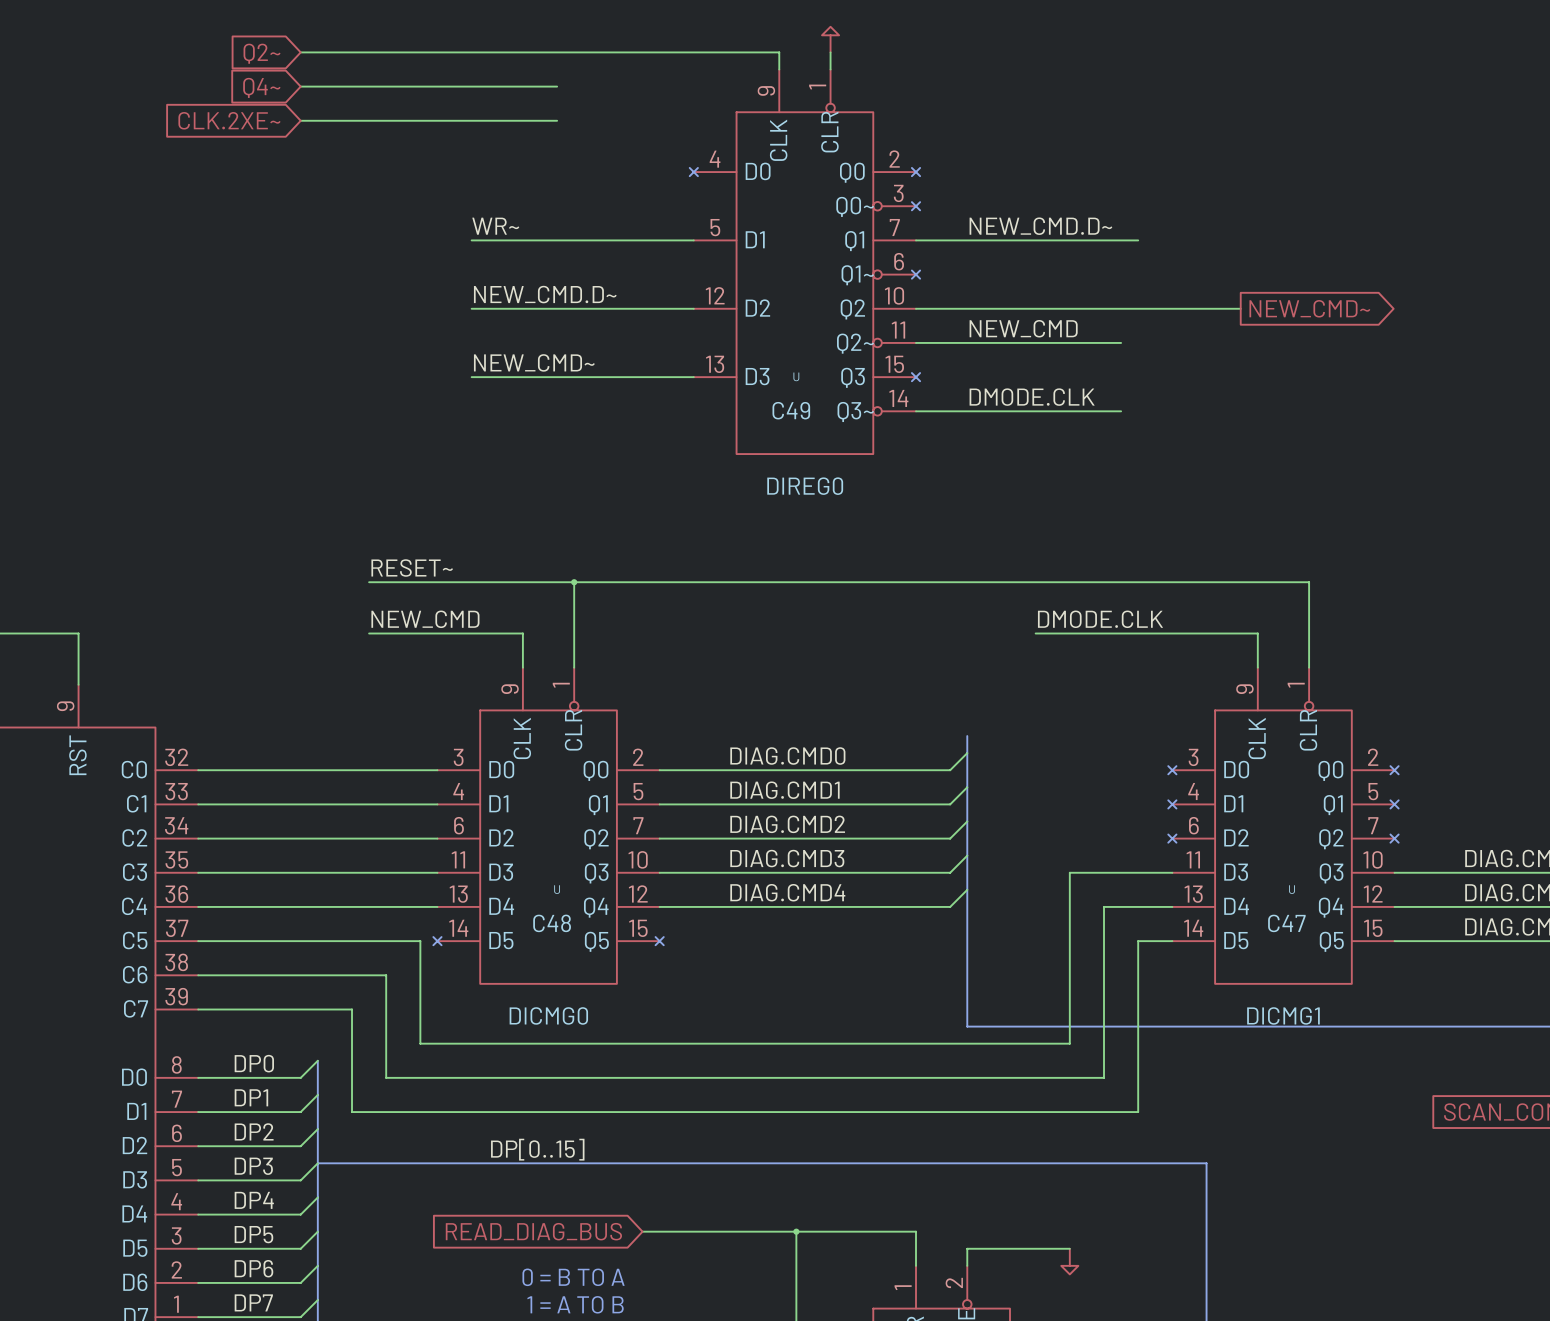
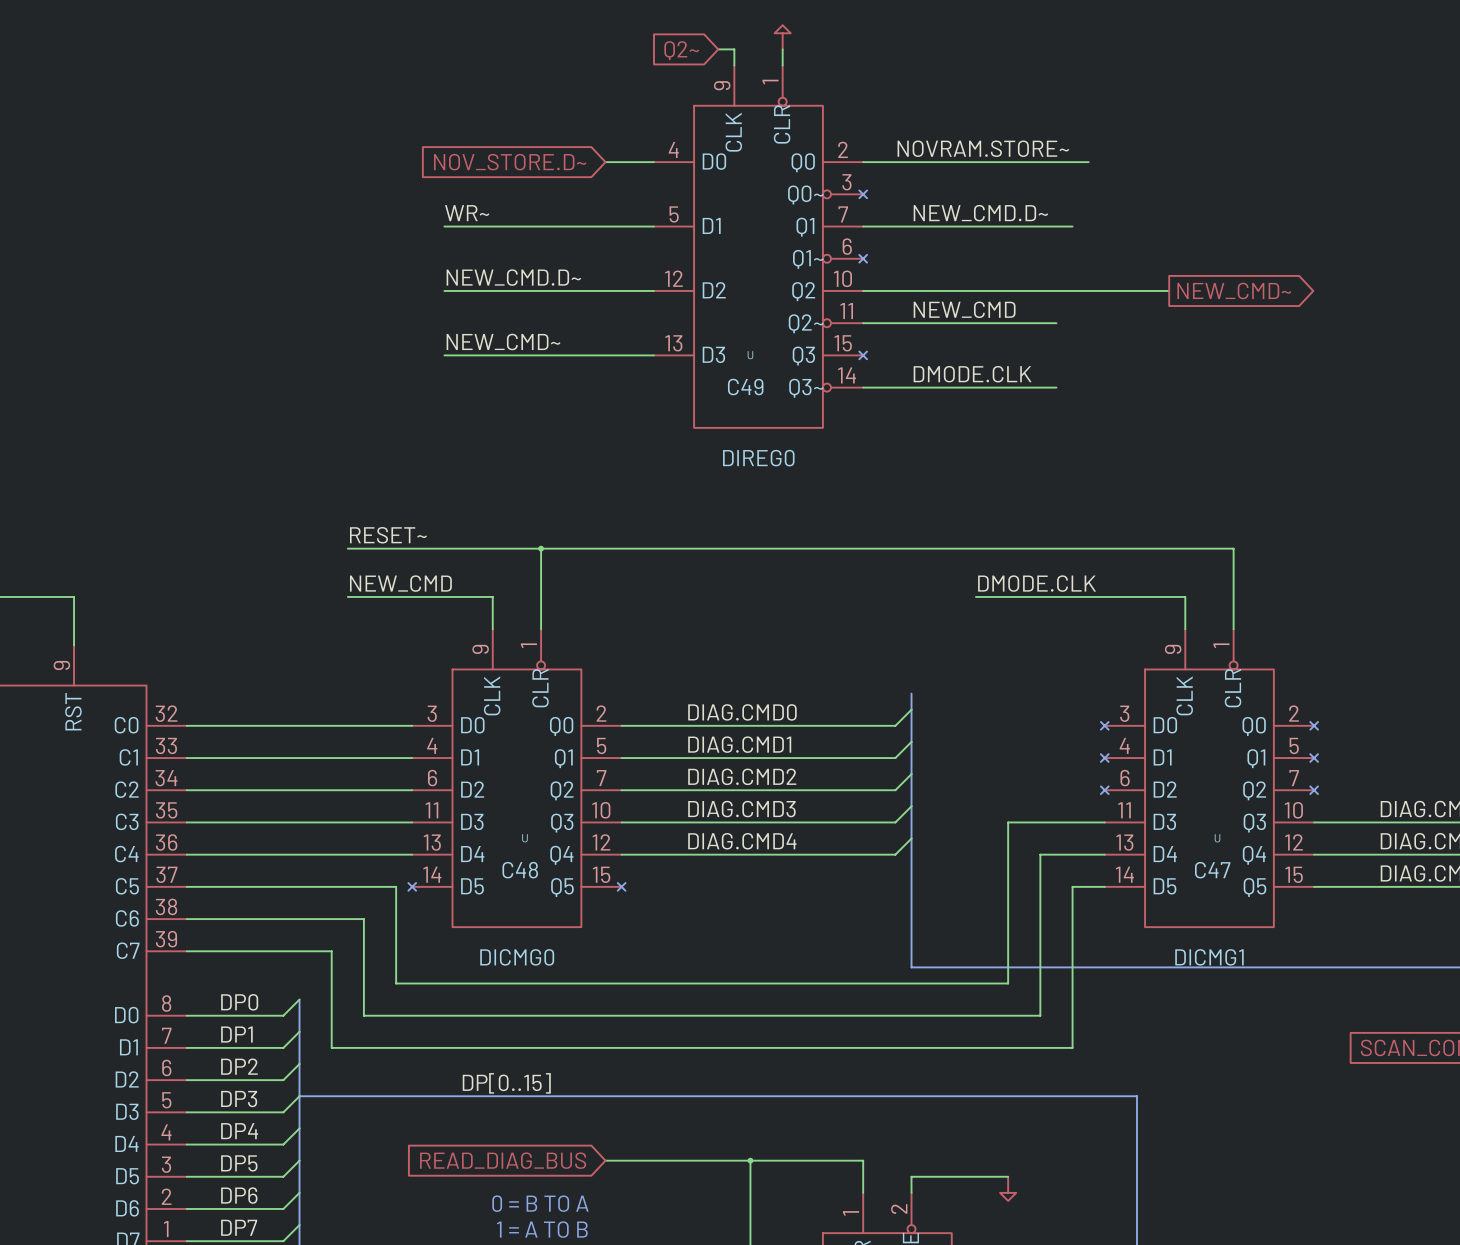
wire: (300, 52) (762, 52) -> none
global label: Q2~ (262, 53) -> none
global label: none -> Q2~ (681, 50)
wire: (300, 86) (557, 86) -> none
global label: Q4~ (261, 87) -> none
global label: CLK.2XE~ (229, 120) -> none
wire: (300, 120) (557, 120) -> none
label: none -> NOVRAM.STORE~ (983, 148)
global label: none -> NOV_STORE.D~ (510, 162)
wire: none -> (605, 162) (653, 162)
no-connect mark: (693, 172) -> none
wire: none -> (863, 162) (1088, 162)
no-connect mark: (916, 172) -> none

